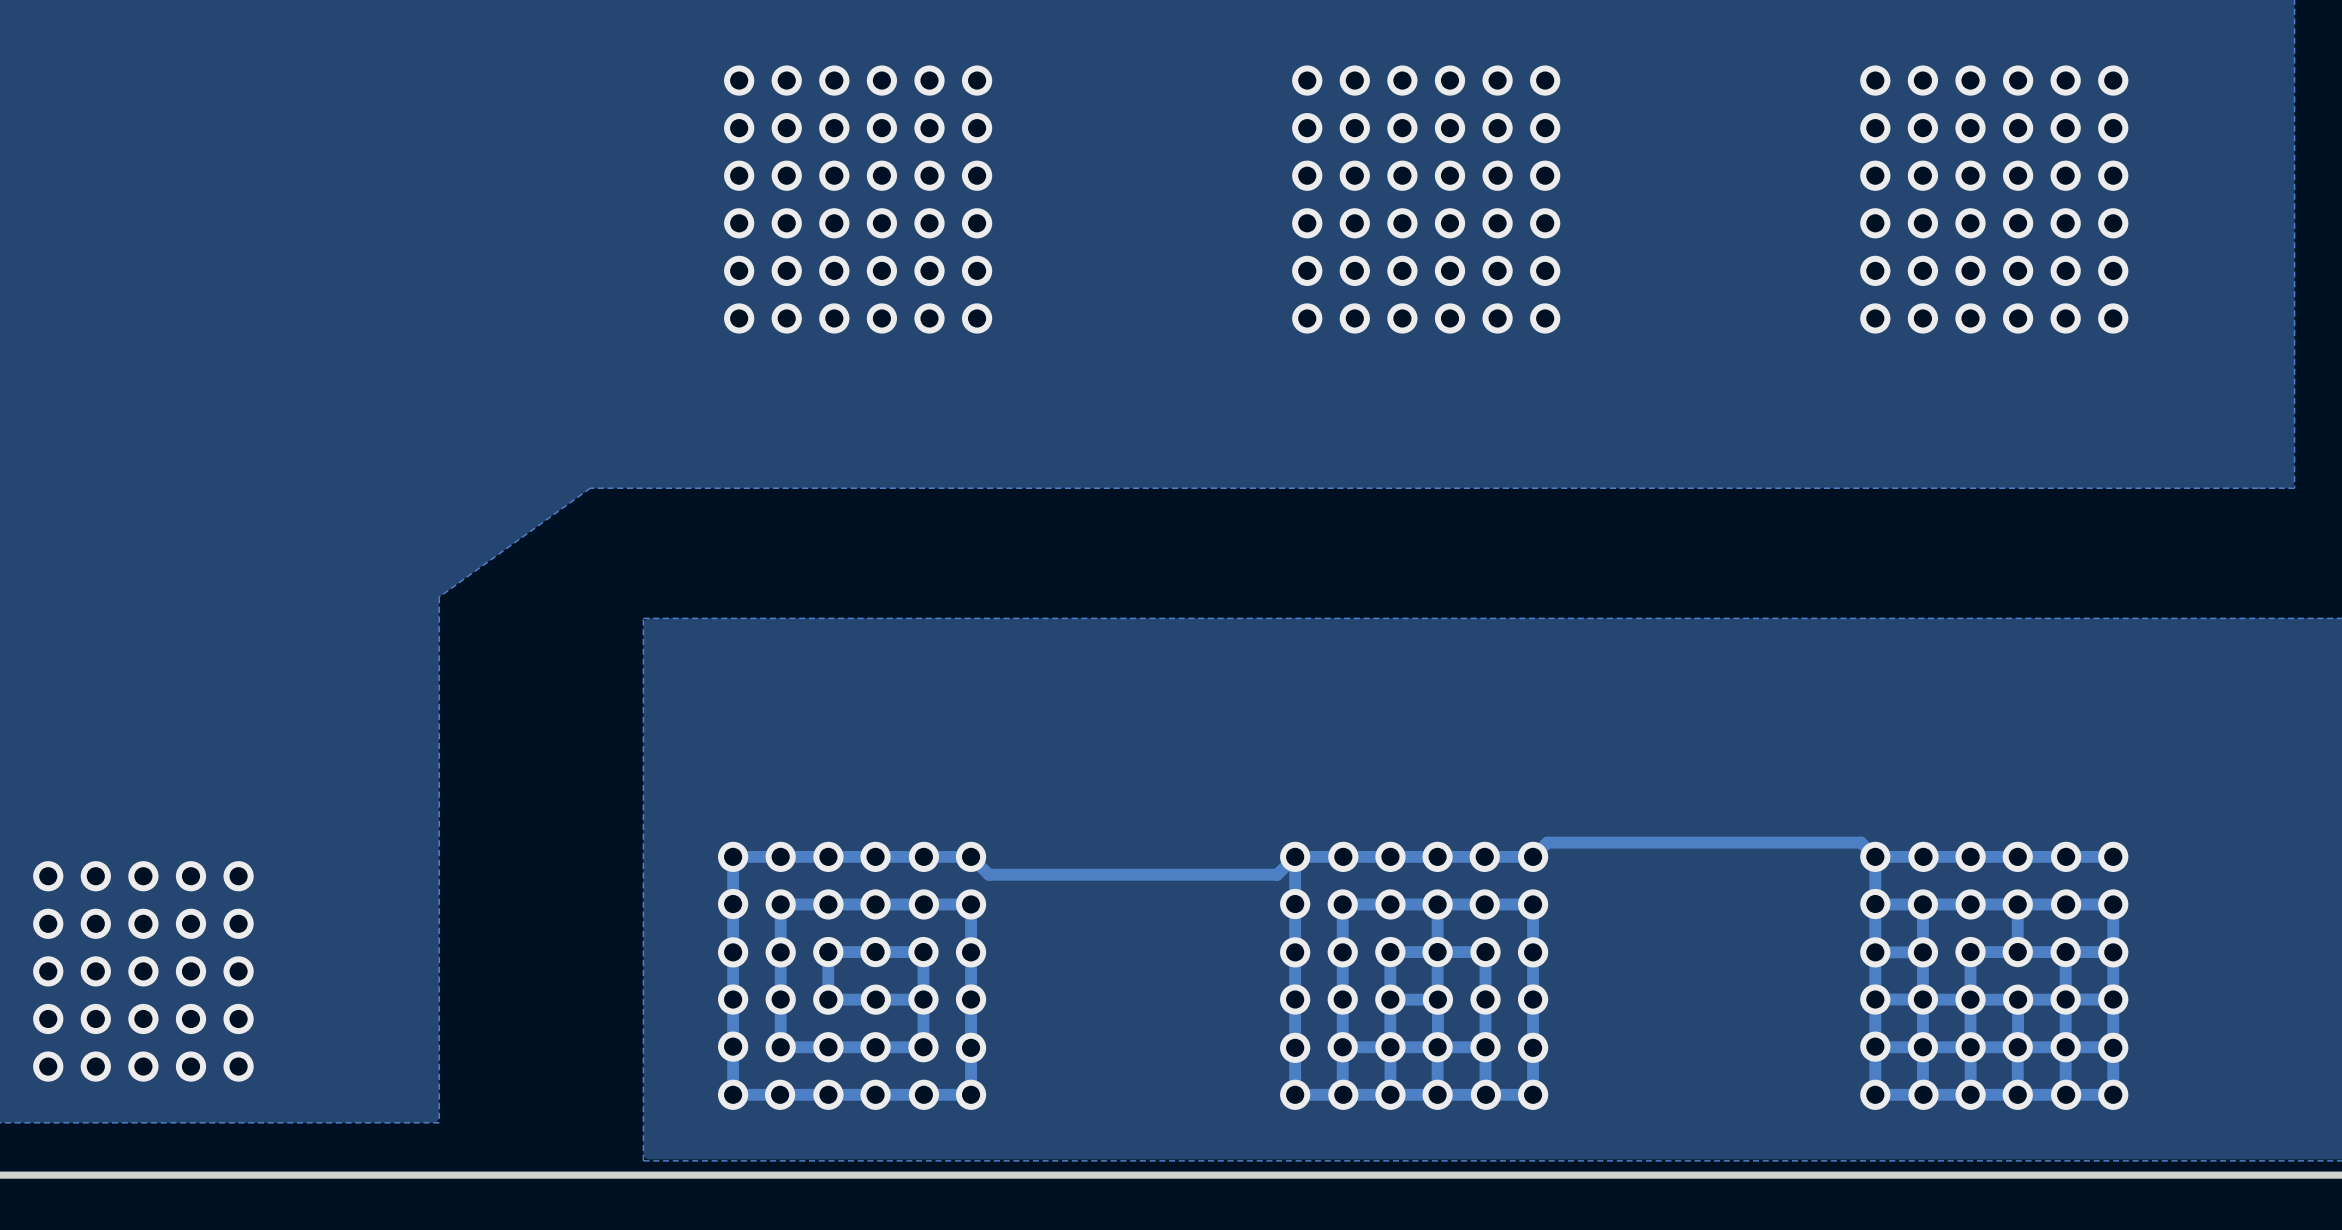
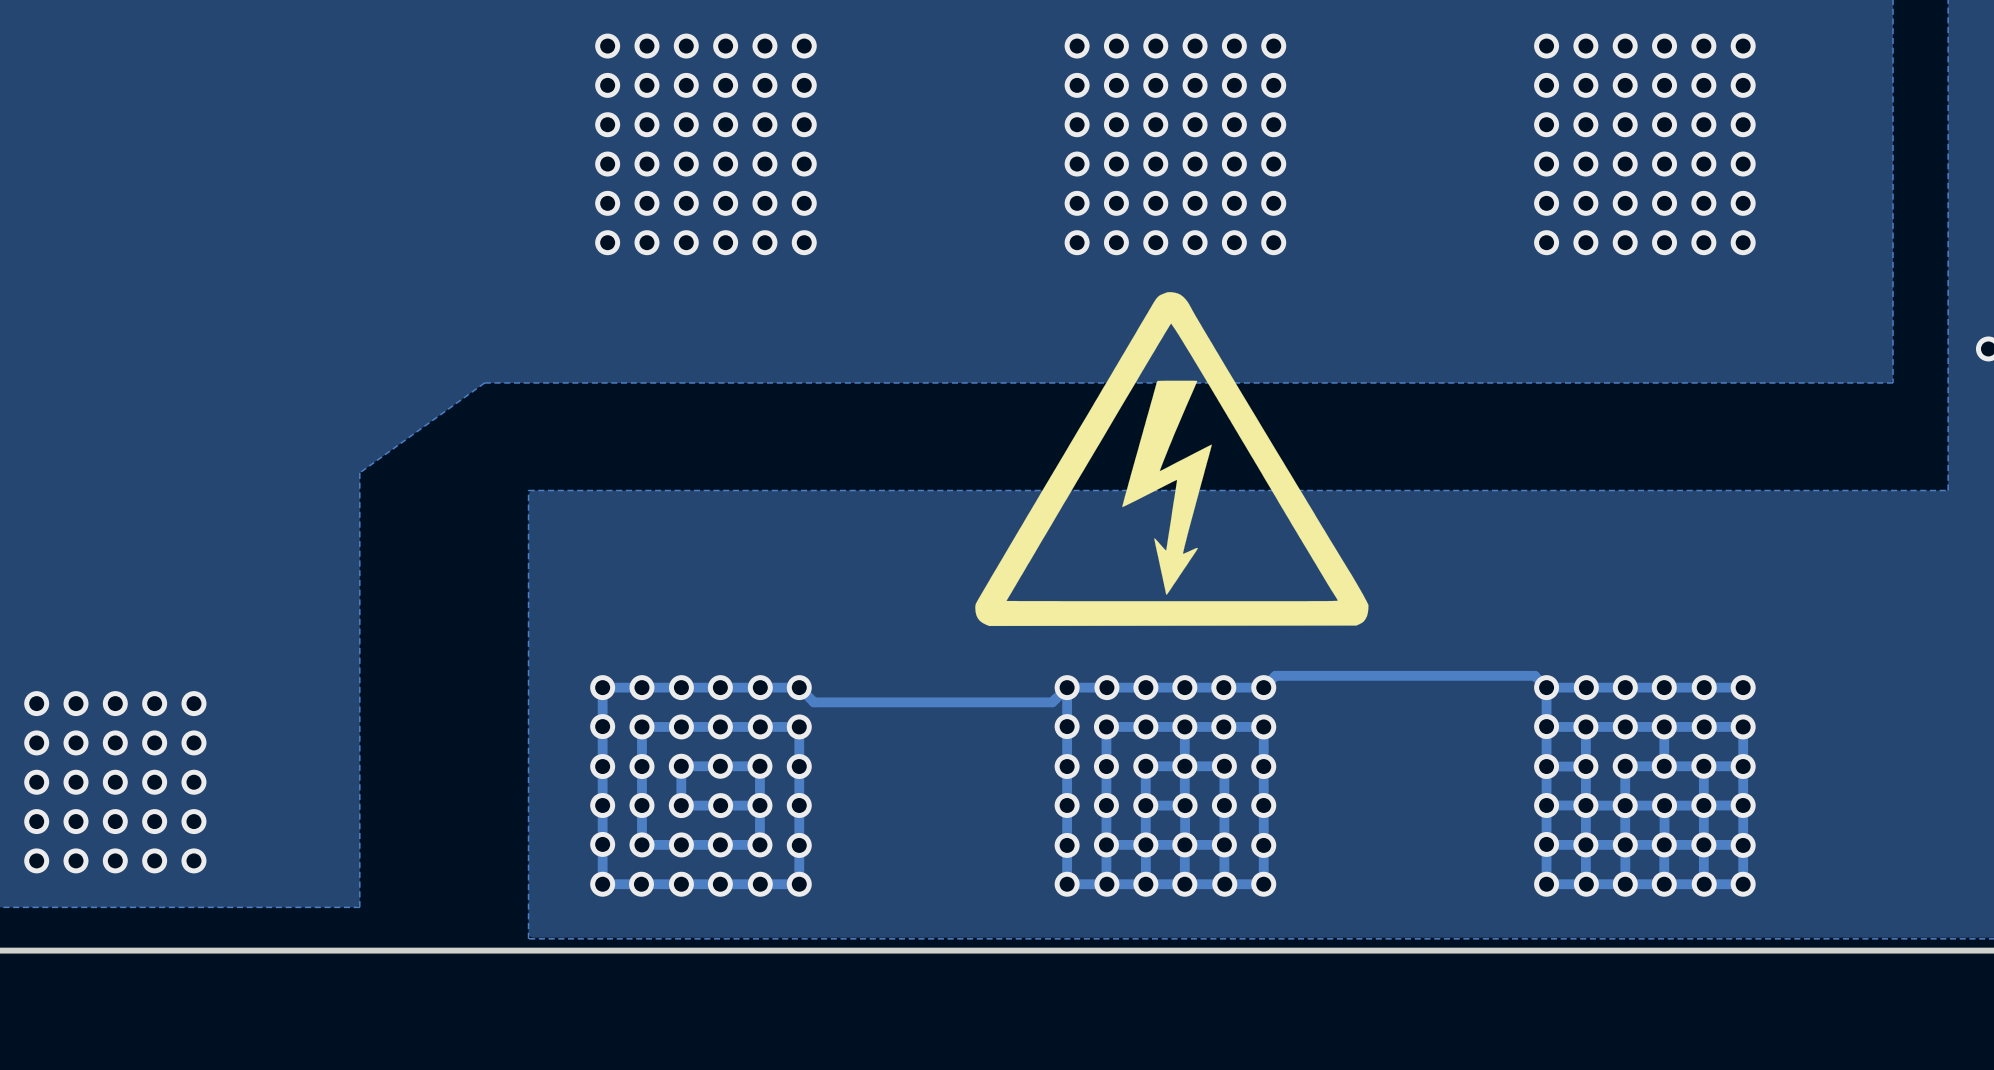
drawing: none -> [975, 292, 1369, 627]

